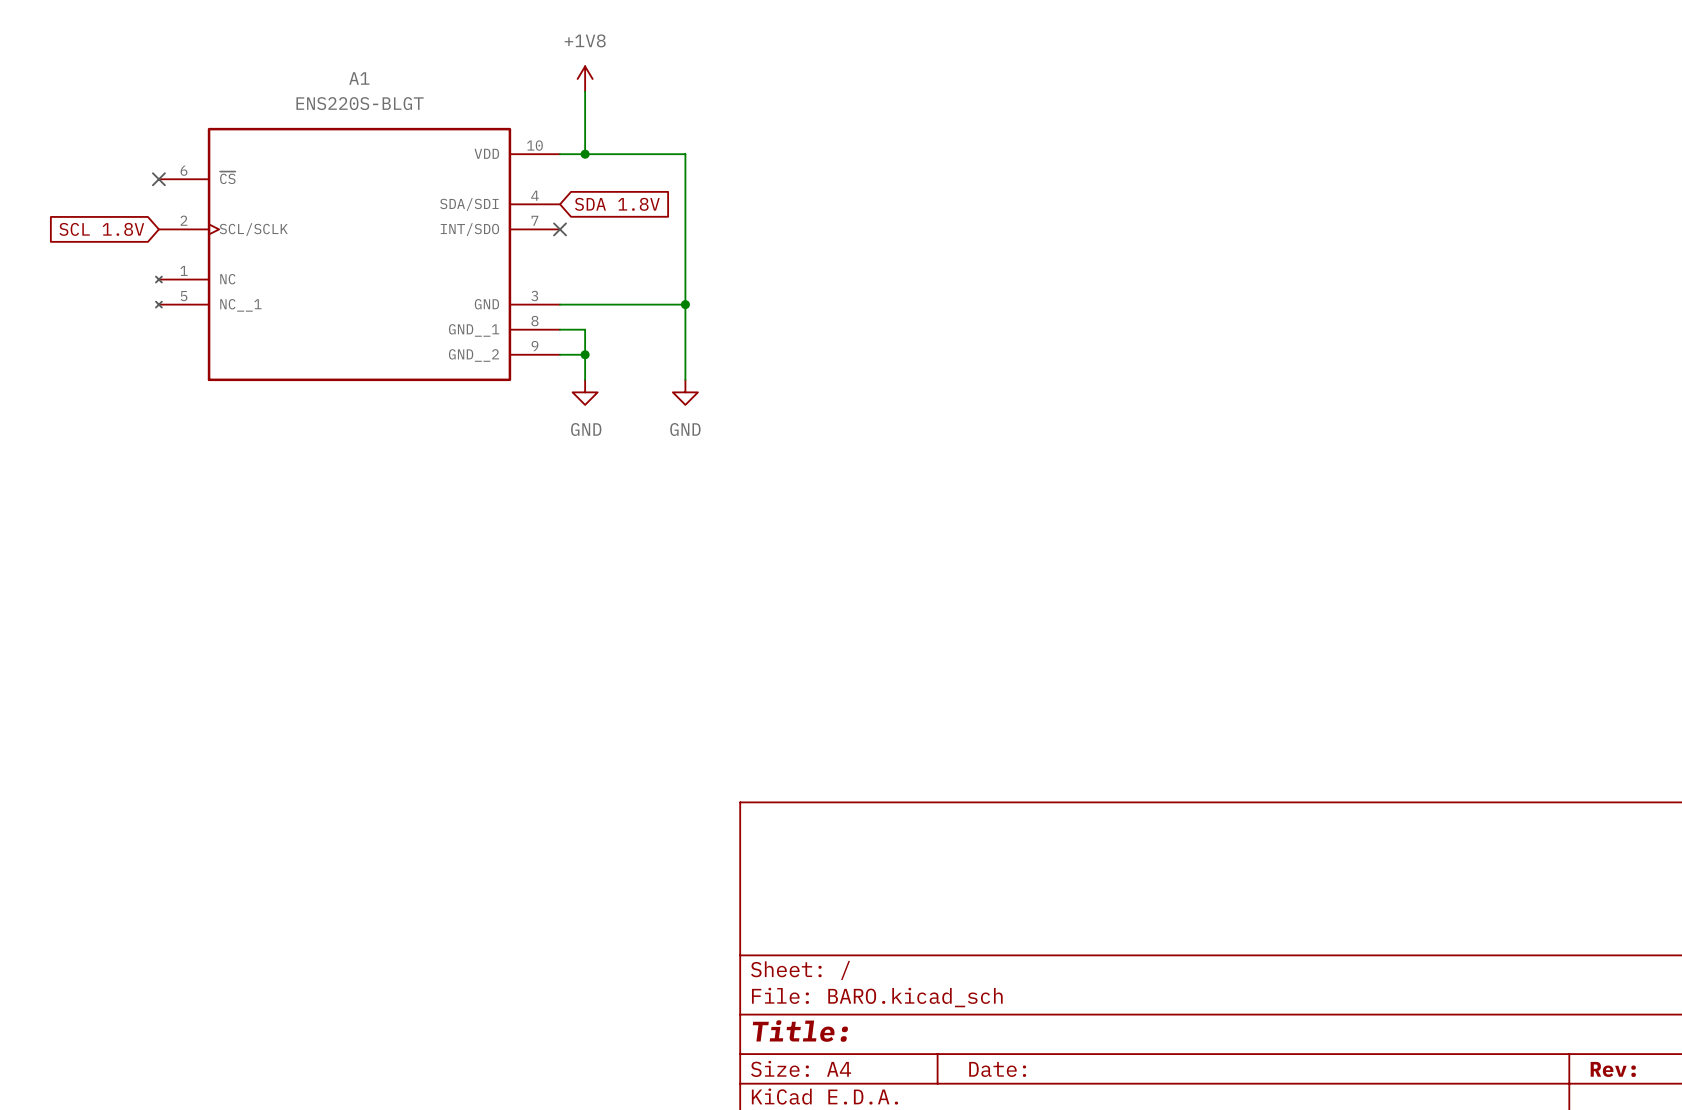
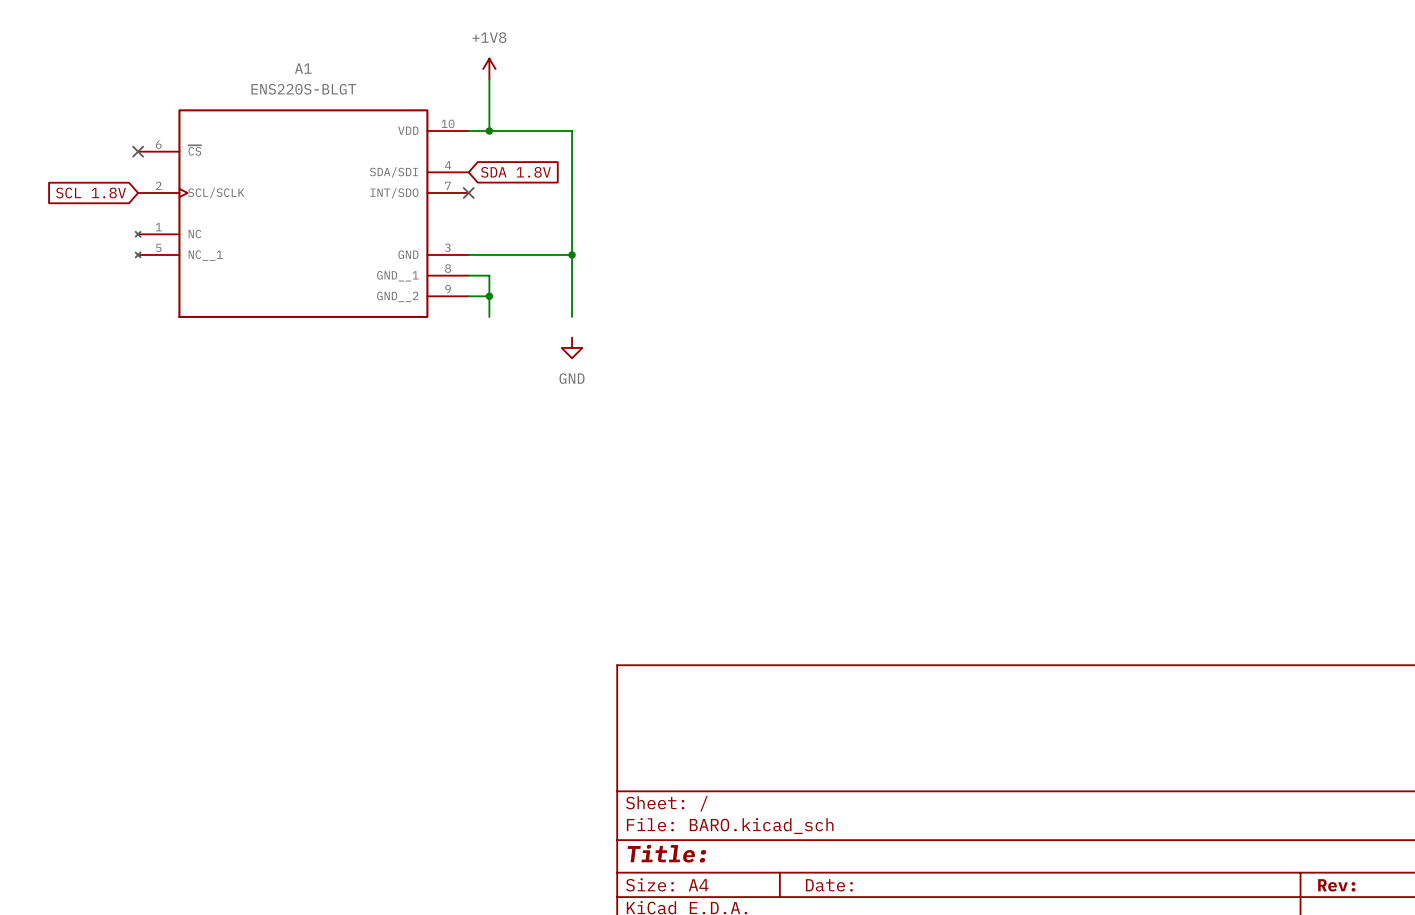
power symbol: GND (585, 392) -> none
power symbol position: GND (685, 392) -> GND (572, 347)

